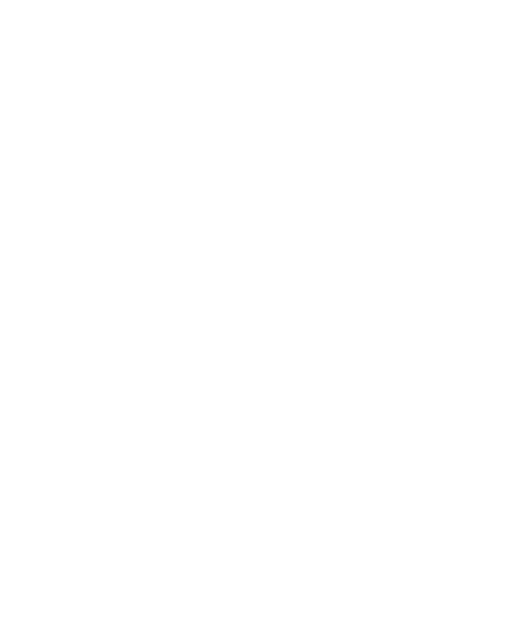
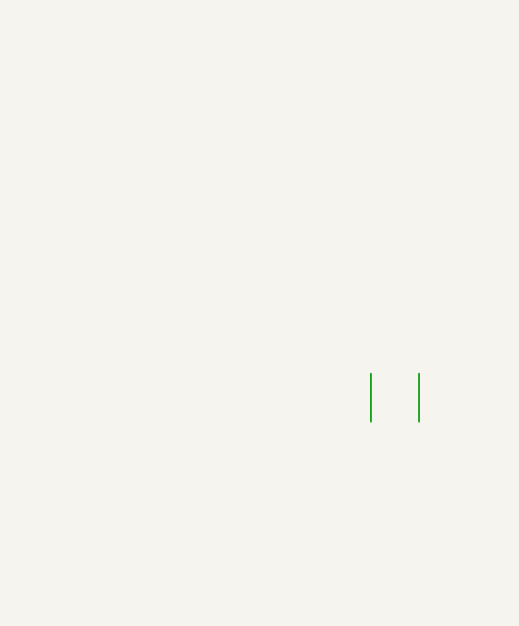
wire: none -> (370, 373) (370, 421)
wire: none -> (419, 373) (419, 421)

